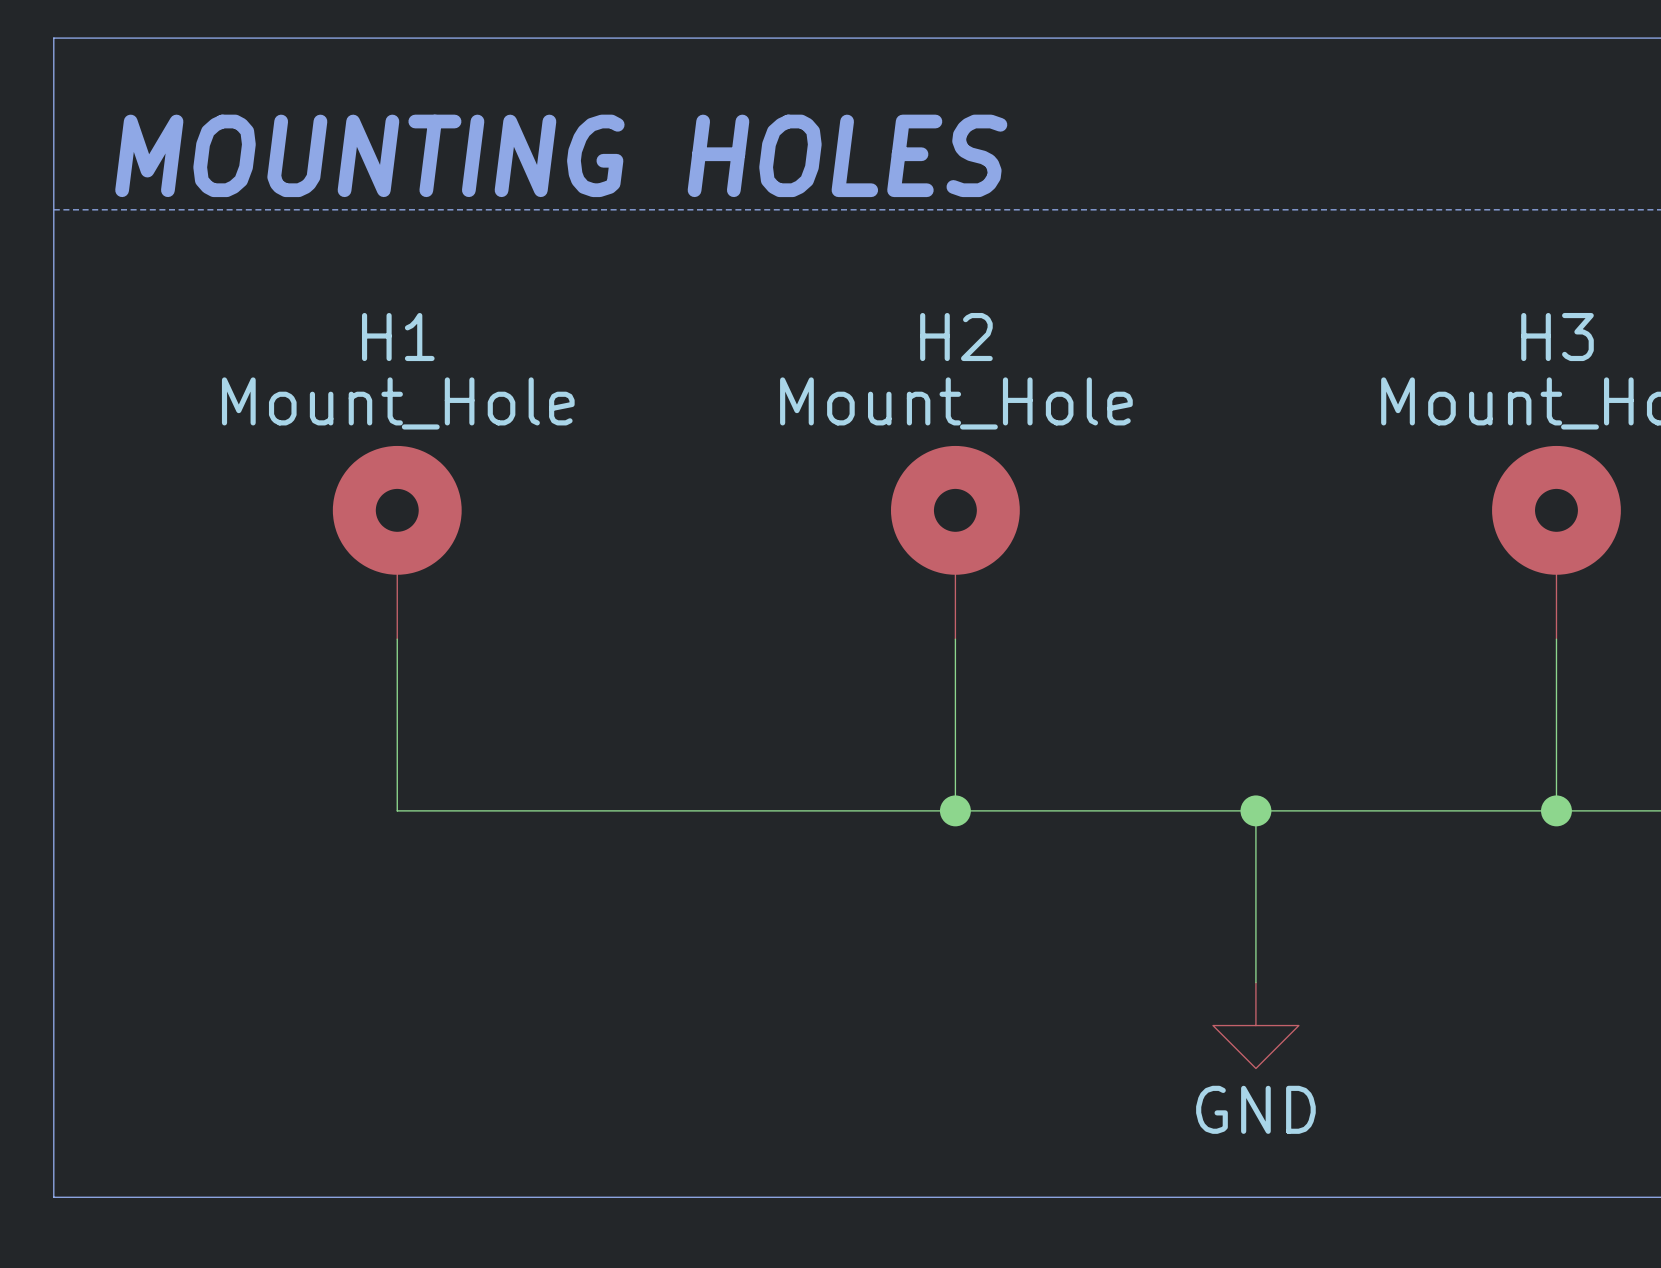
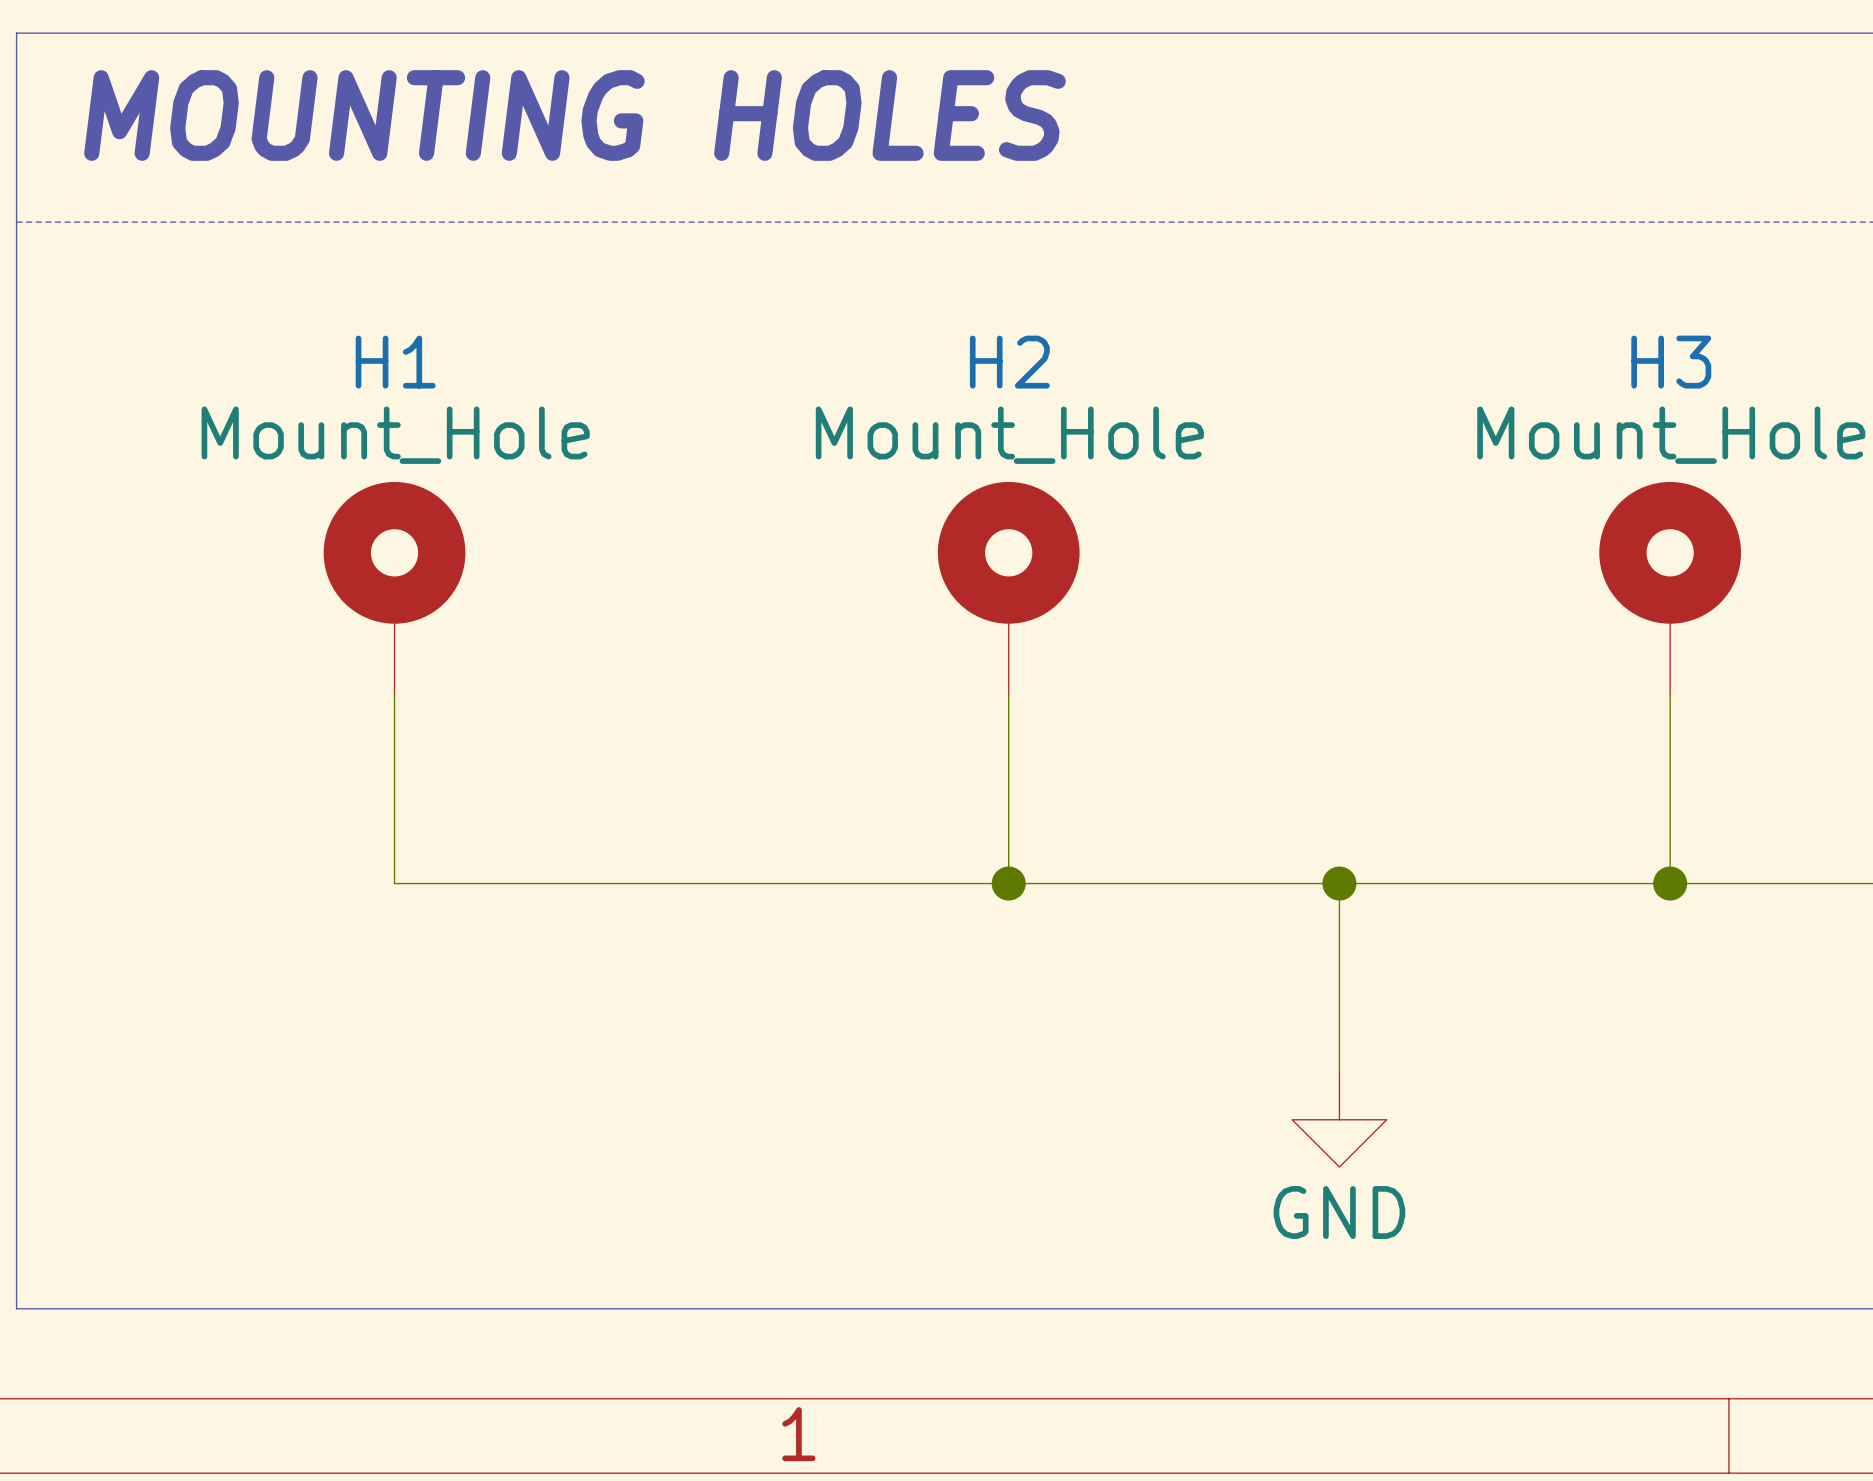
text position: MOUNTING HOLES (561, 155) -> MOUNTING HOLES (575, 115)

